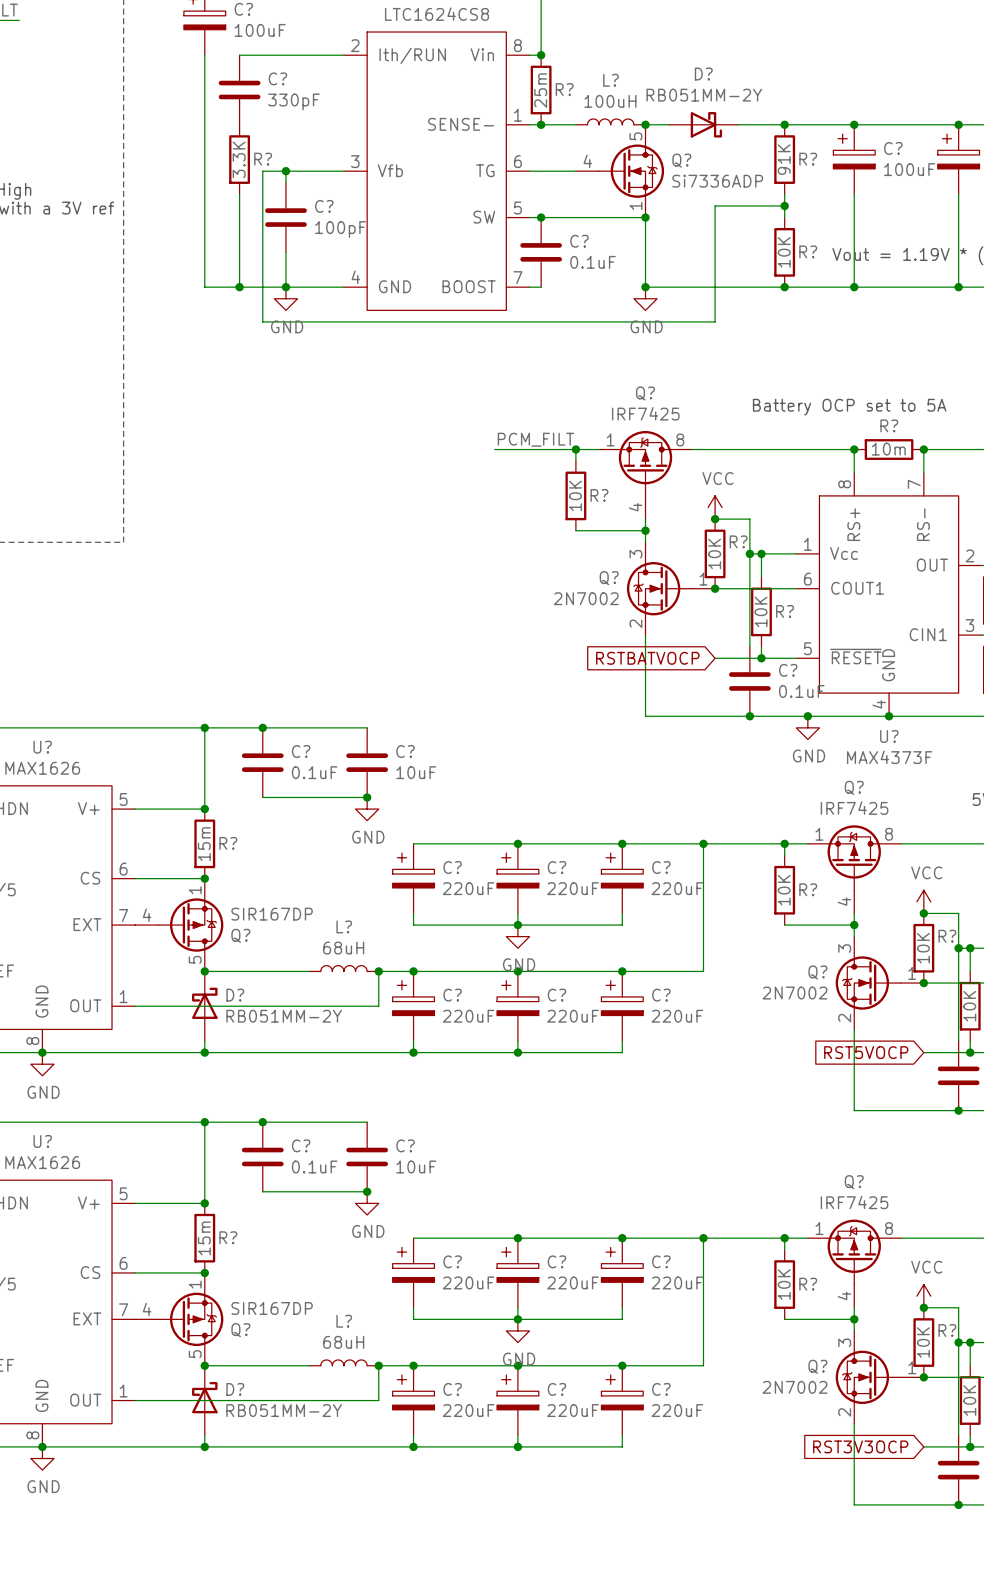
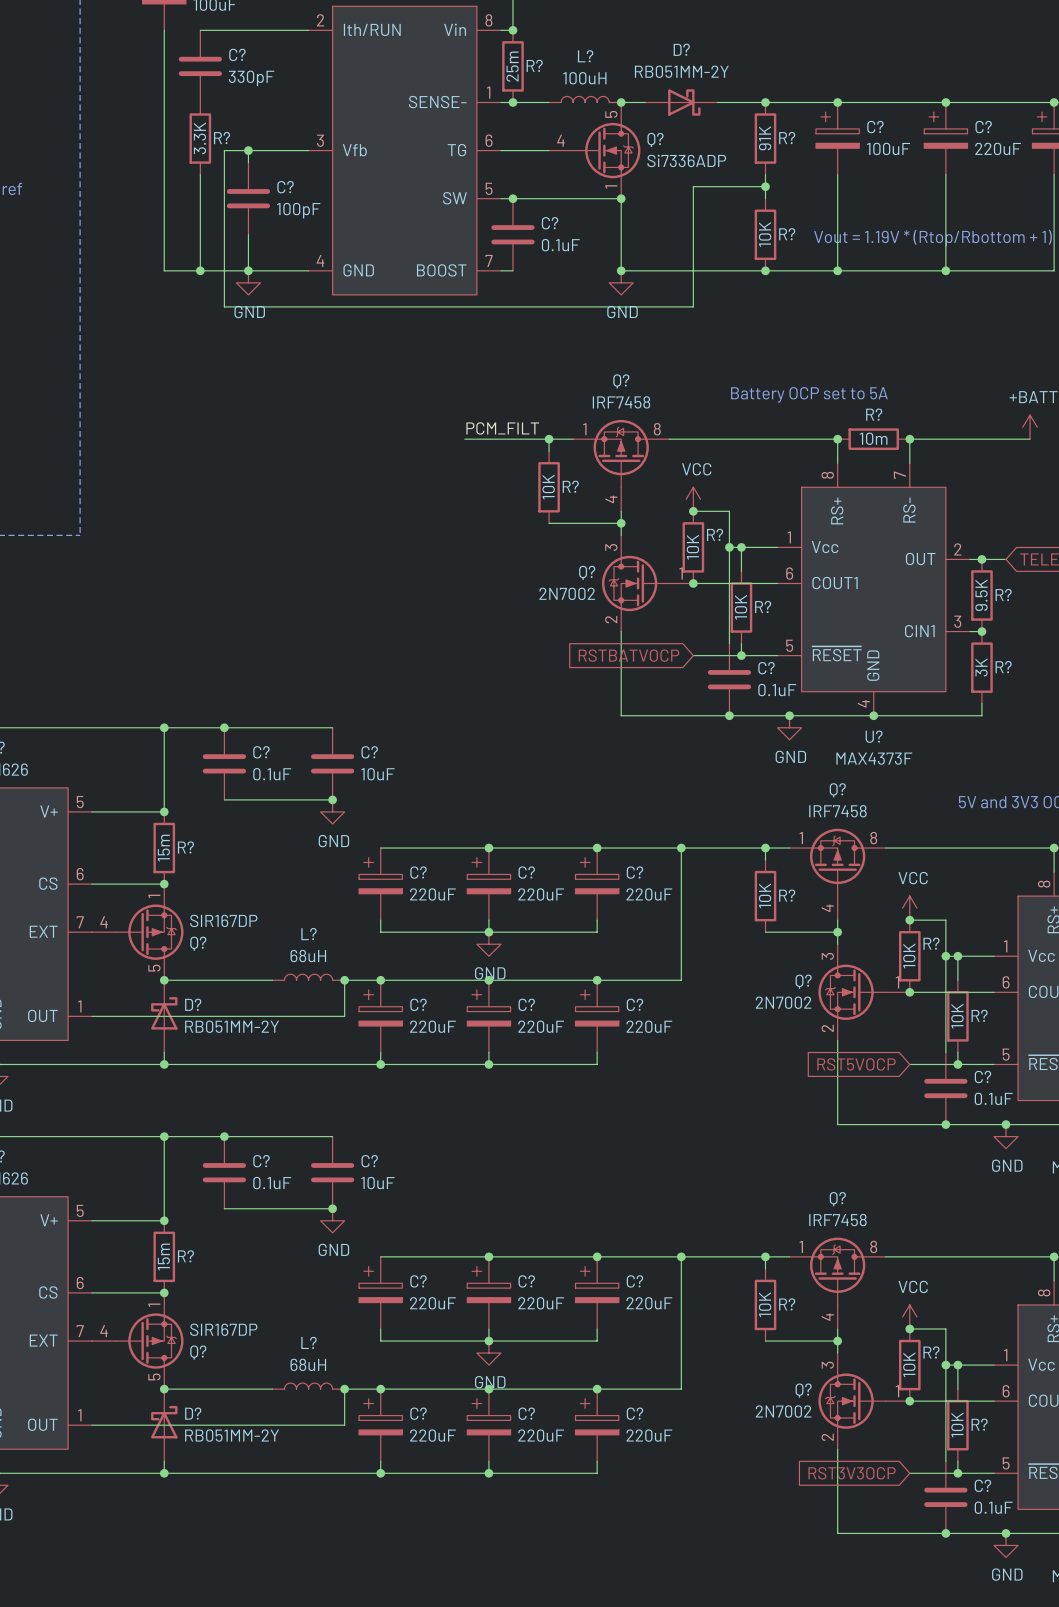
Q? value: IRF7425 (645, 413) -> IRF7458 (621, 402)
Q? value: IRF7425 (854, 808) -> IRF7458 (837, 811)
Q? value: IRF7425 (854, 1202) -> IRF7458 (837, 1220)

